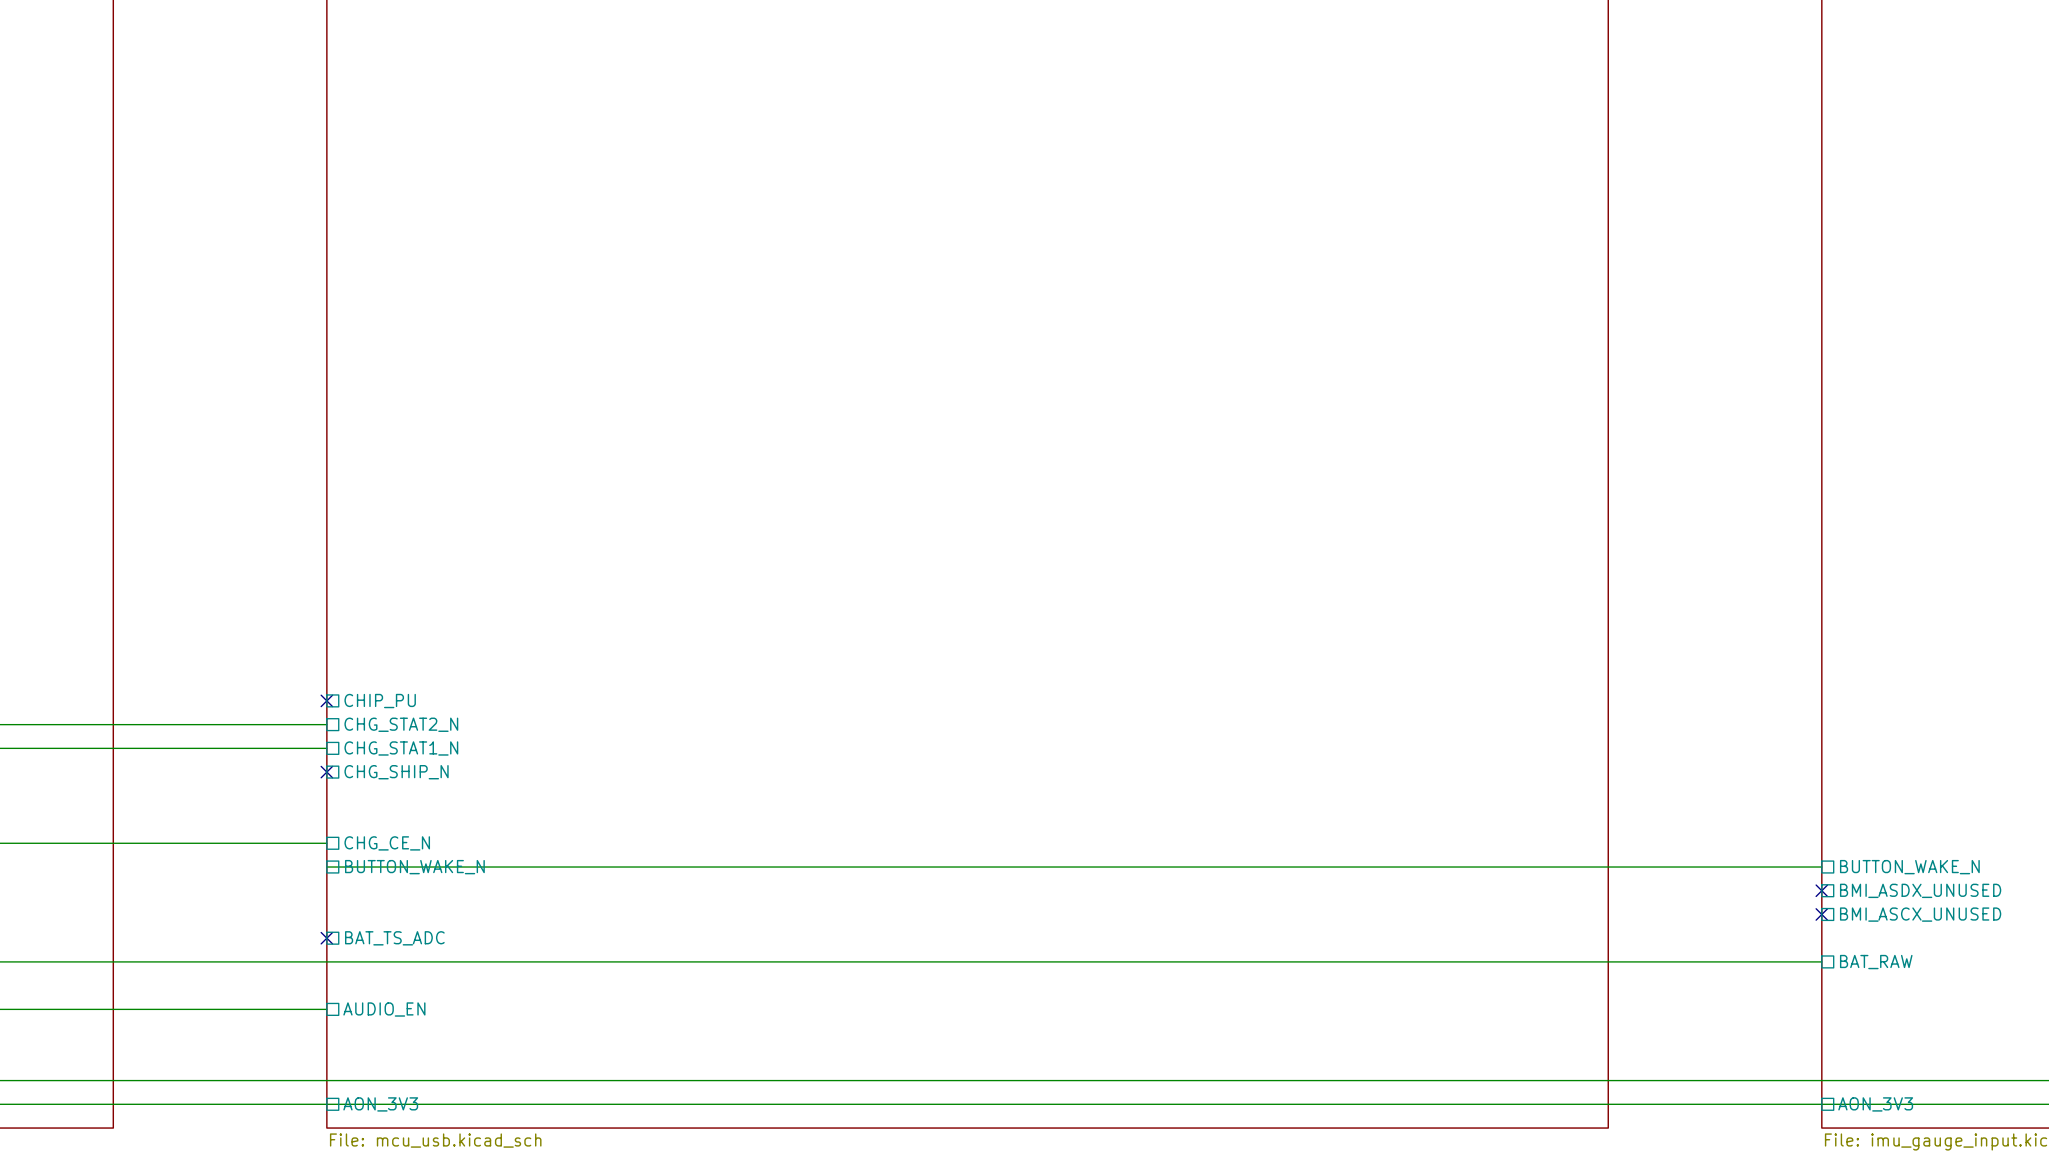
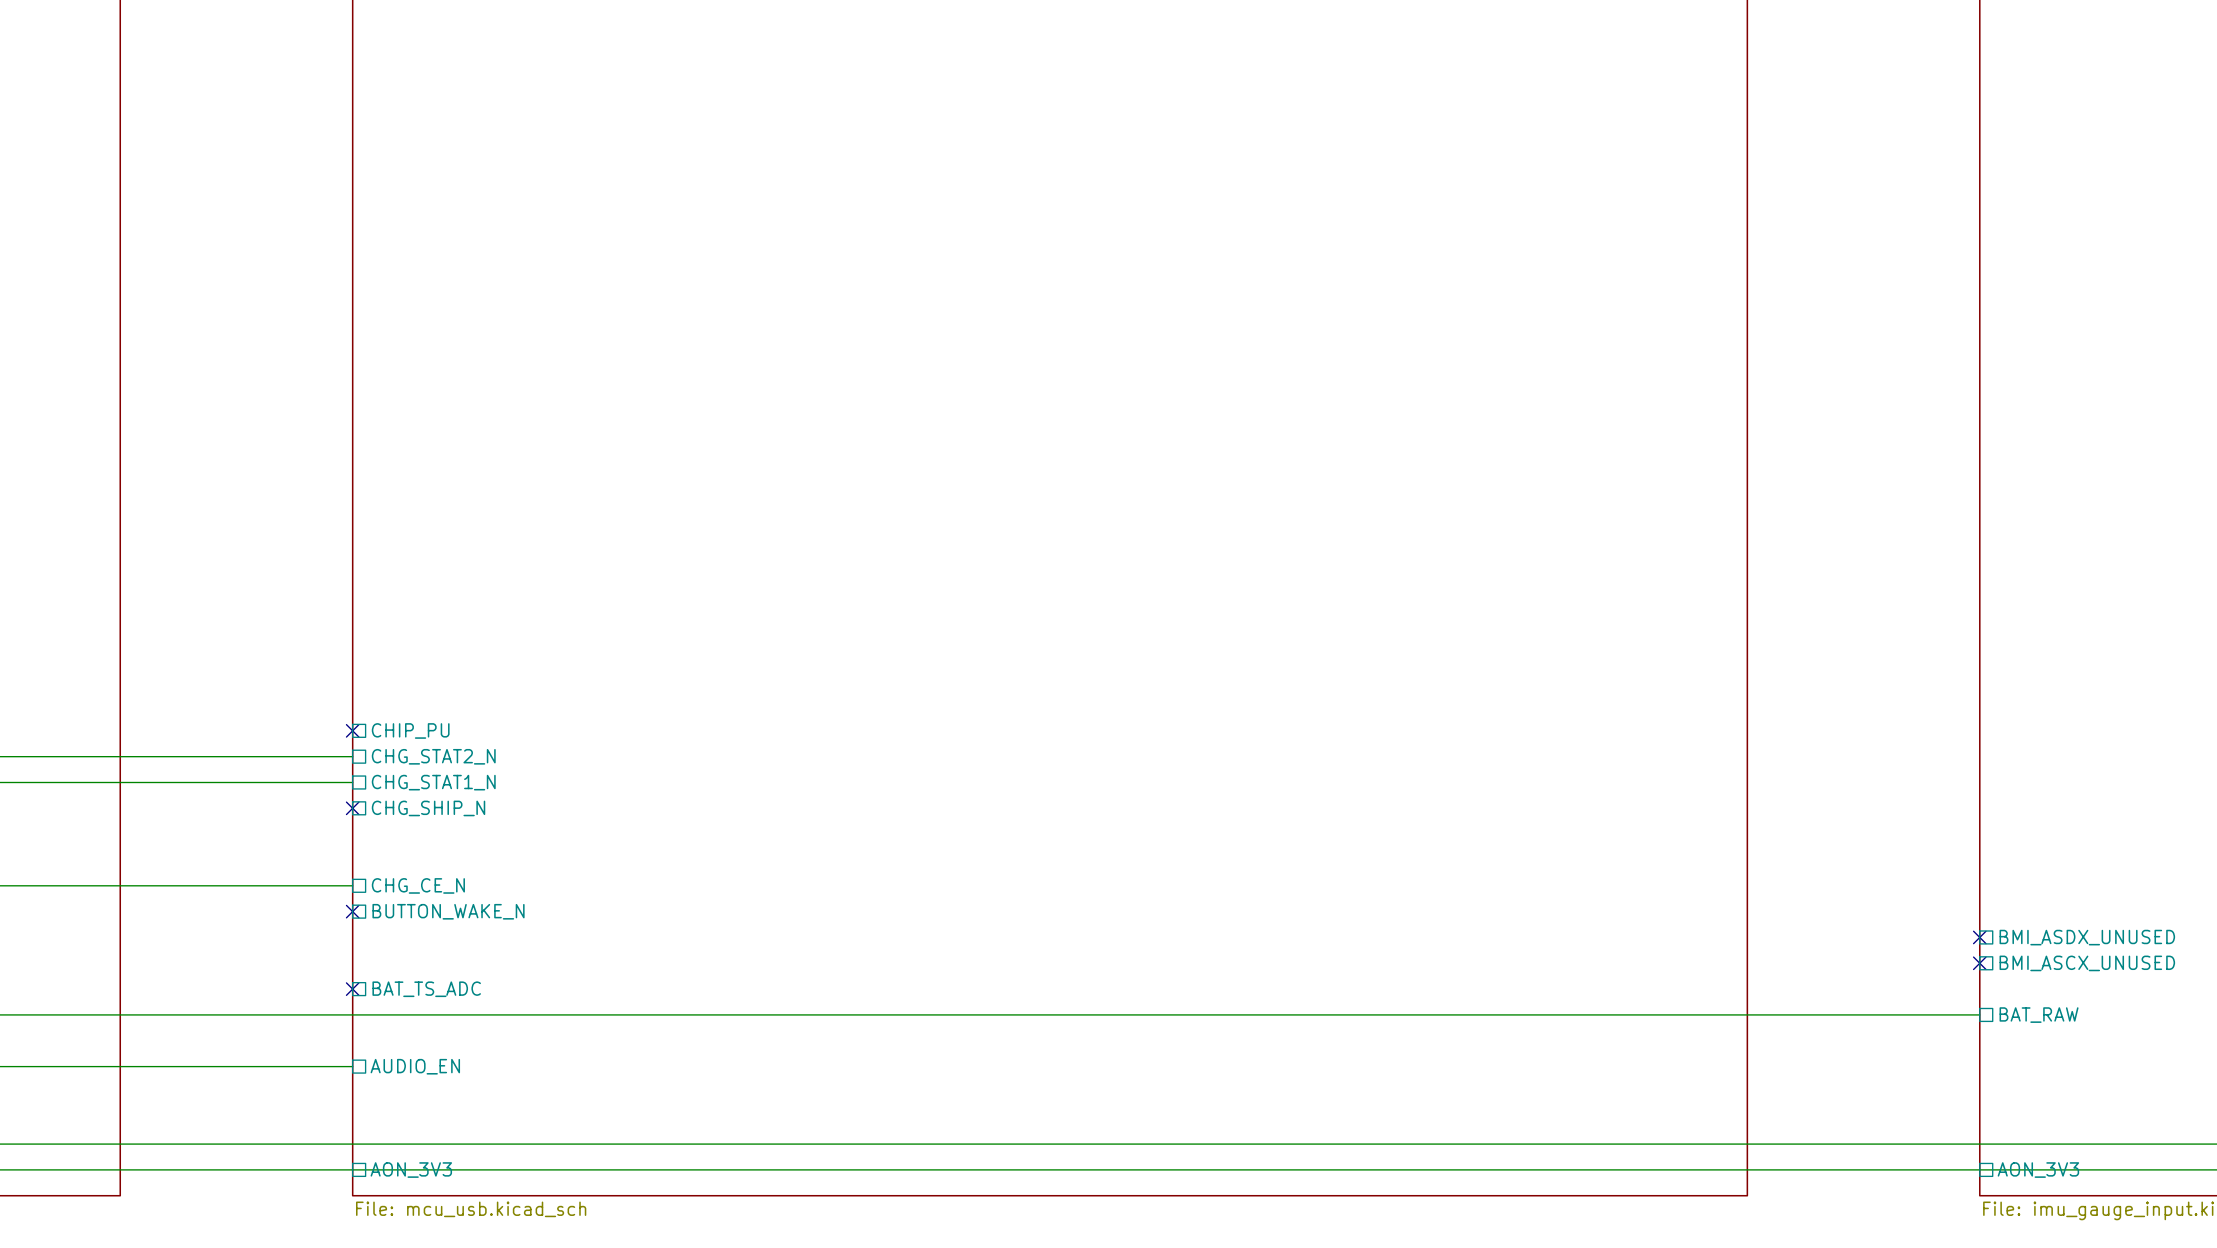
wire: (326, 867) (1821, 867) -> none
no-connect mark: none -> (352, 911)
sheet pin: BUTTON_WAKE_N (1909, 867) -> none

